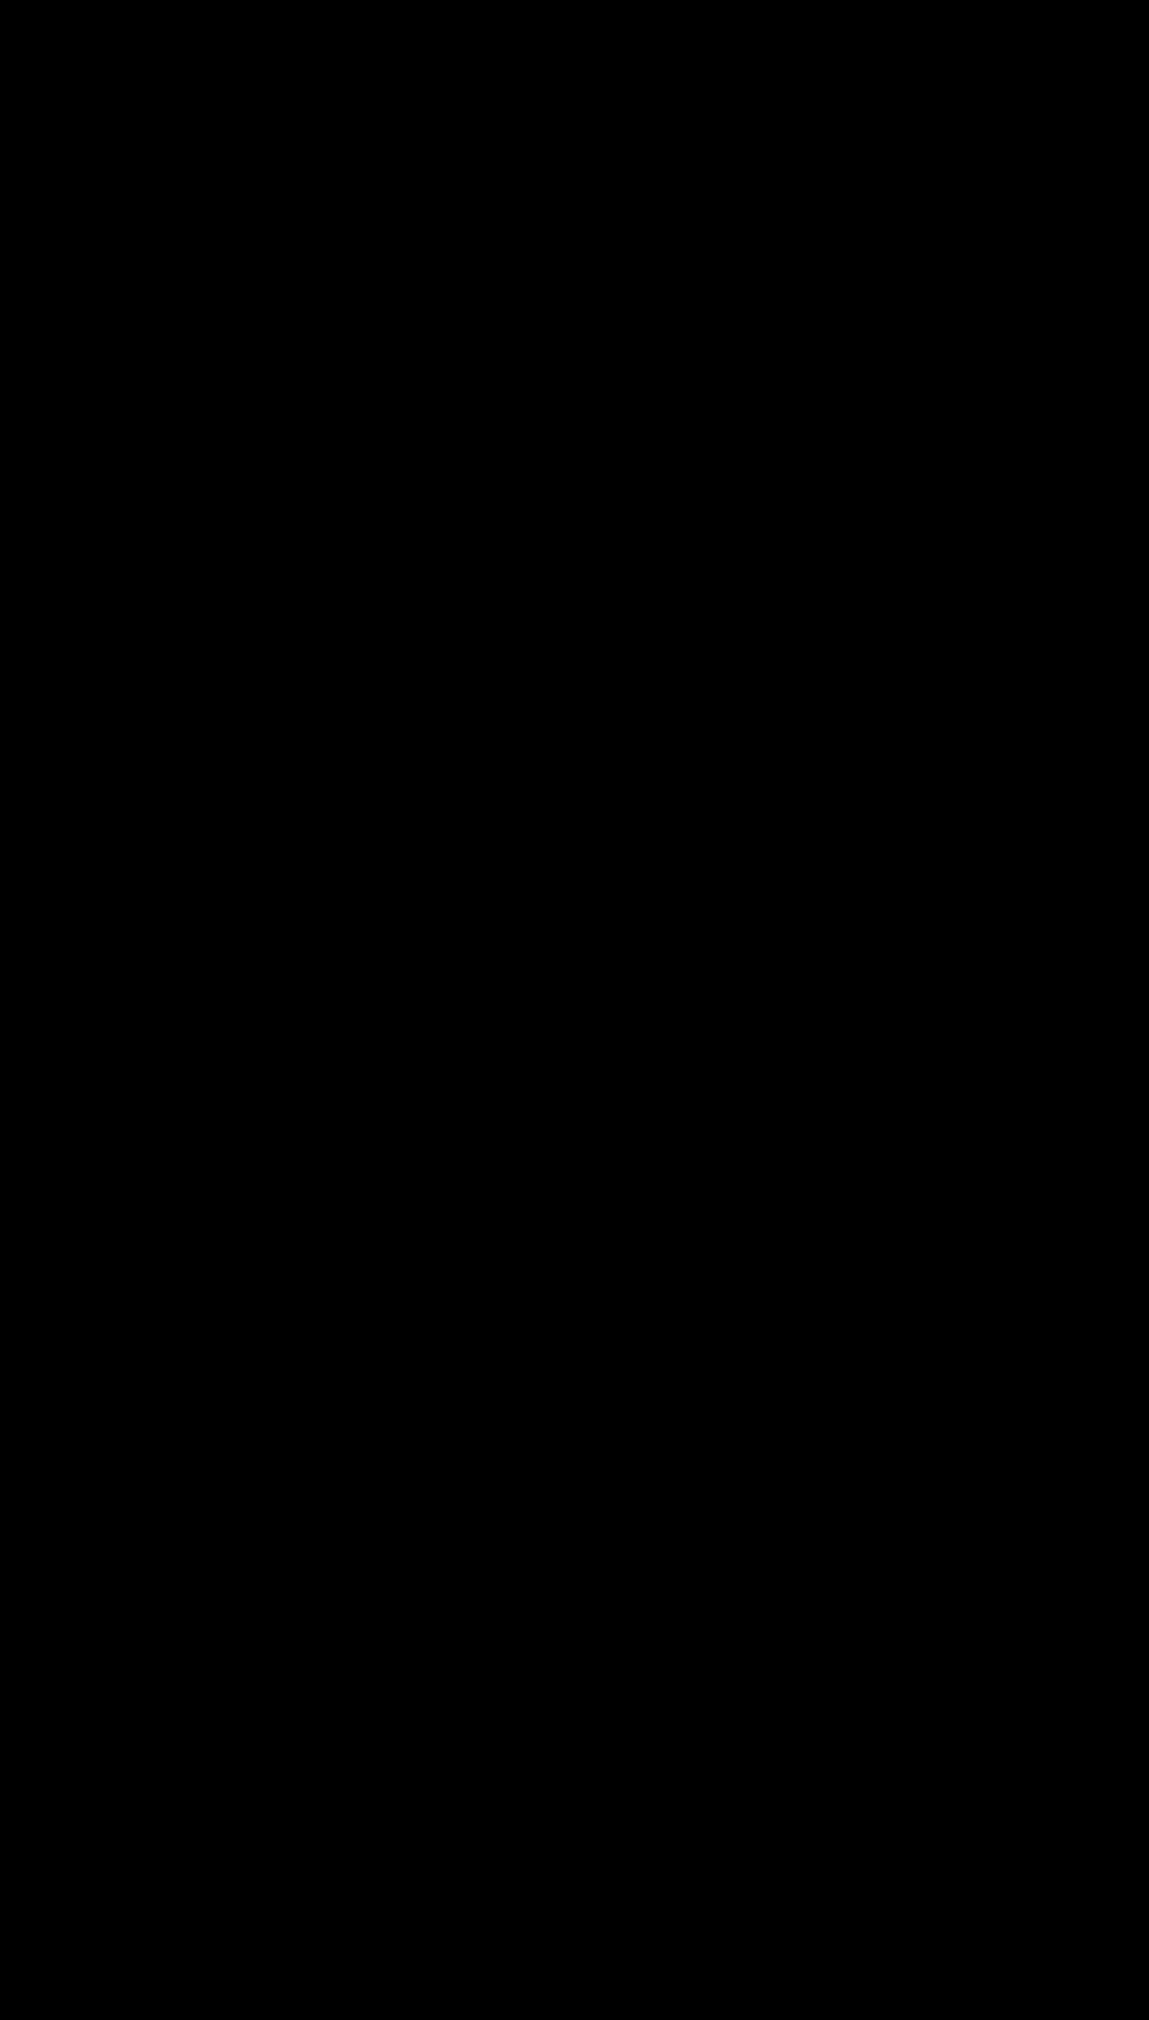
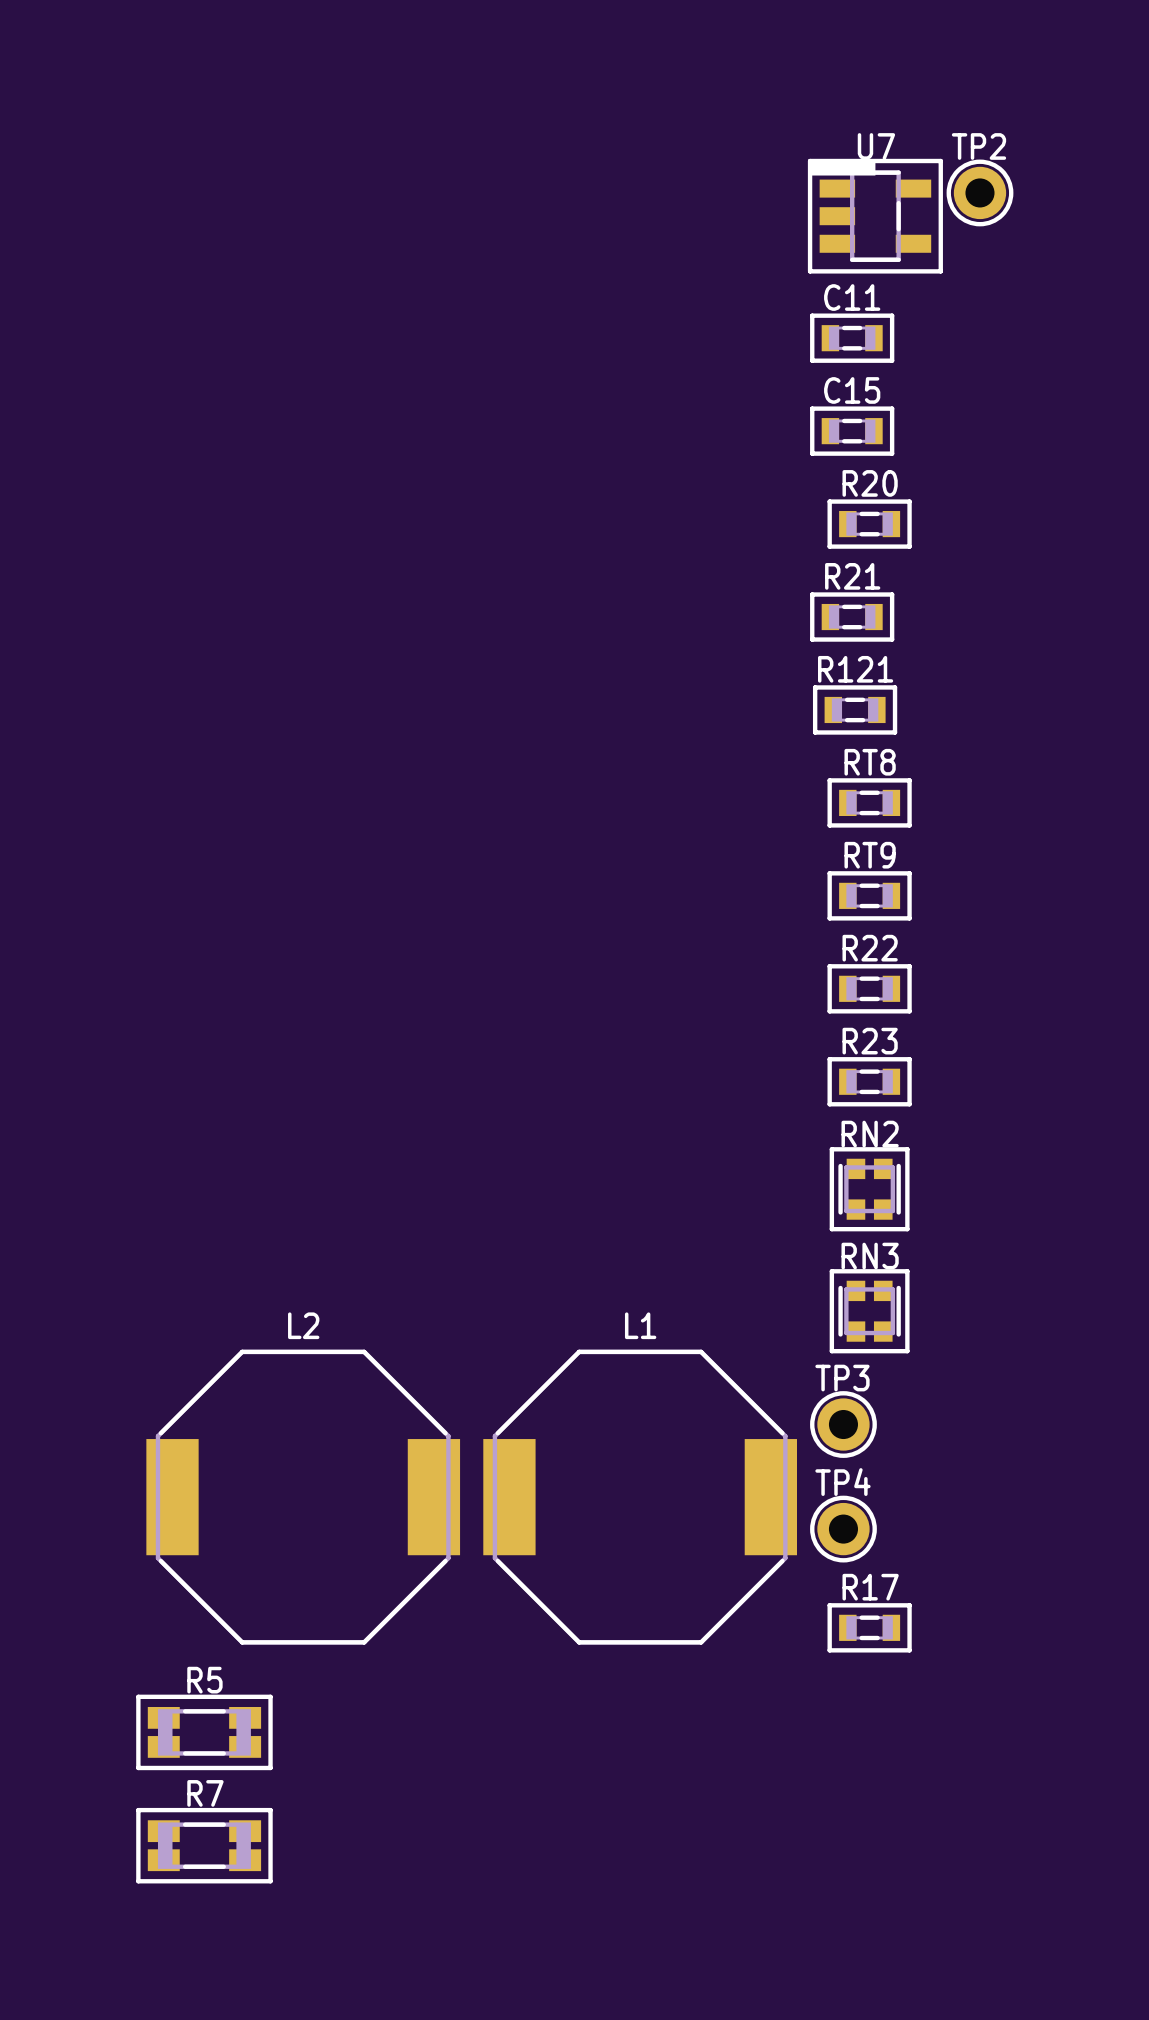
TP2: none -> (979, 192)
U7: none -> (875, 216)
C11: none -> (852, 338)
C15: none -> (852, 431)
R20: none -> (869, 524)
R21: none -> (852, 617)
R121: none -> (855, 709)
RT8: none -> (869, 802)
RT9: none -> (869, 895)
R22: none -> (869, 988)
R23: none -> (869, 1081)
RN2: none -> (869, 1189)
RN3: none -> (869, 1311)
TP3: none -> (843, 1424)
L2: none -> (303, 1497)
L1: none -> (640, 1497)
TP4: none -> (843, 1529)
R17: none -> (869, 1627)
R5: none -> (204, 1732)
R7: none -> (204, 1845)

